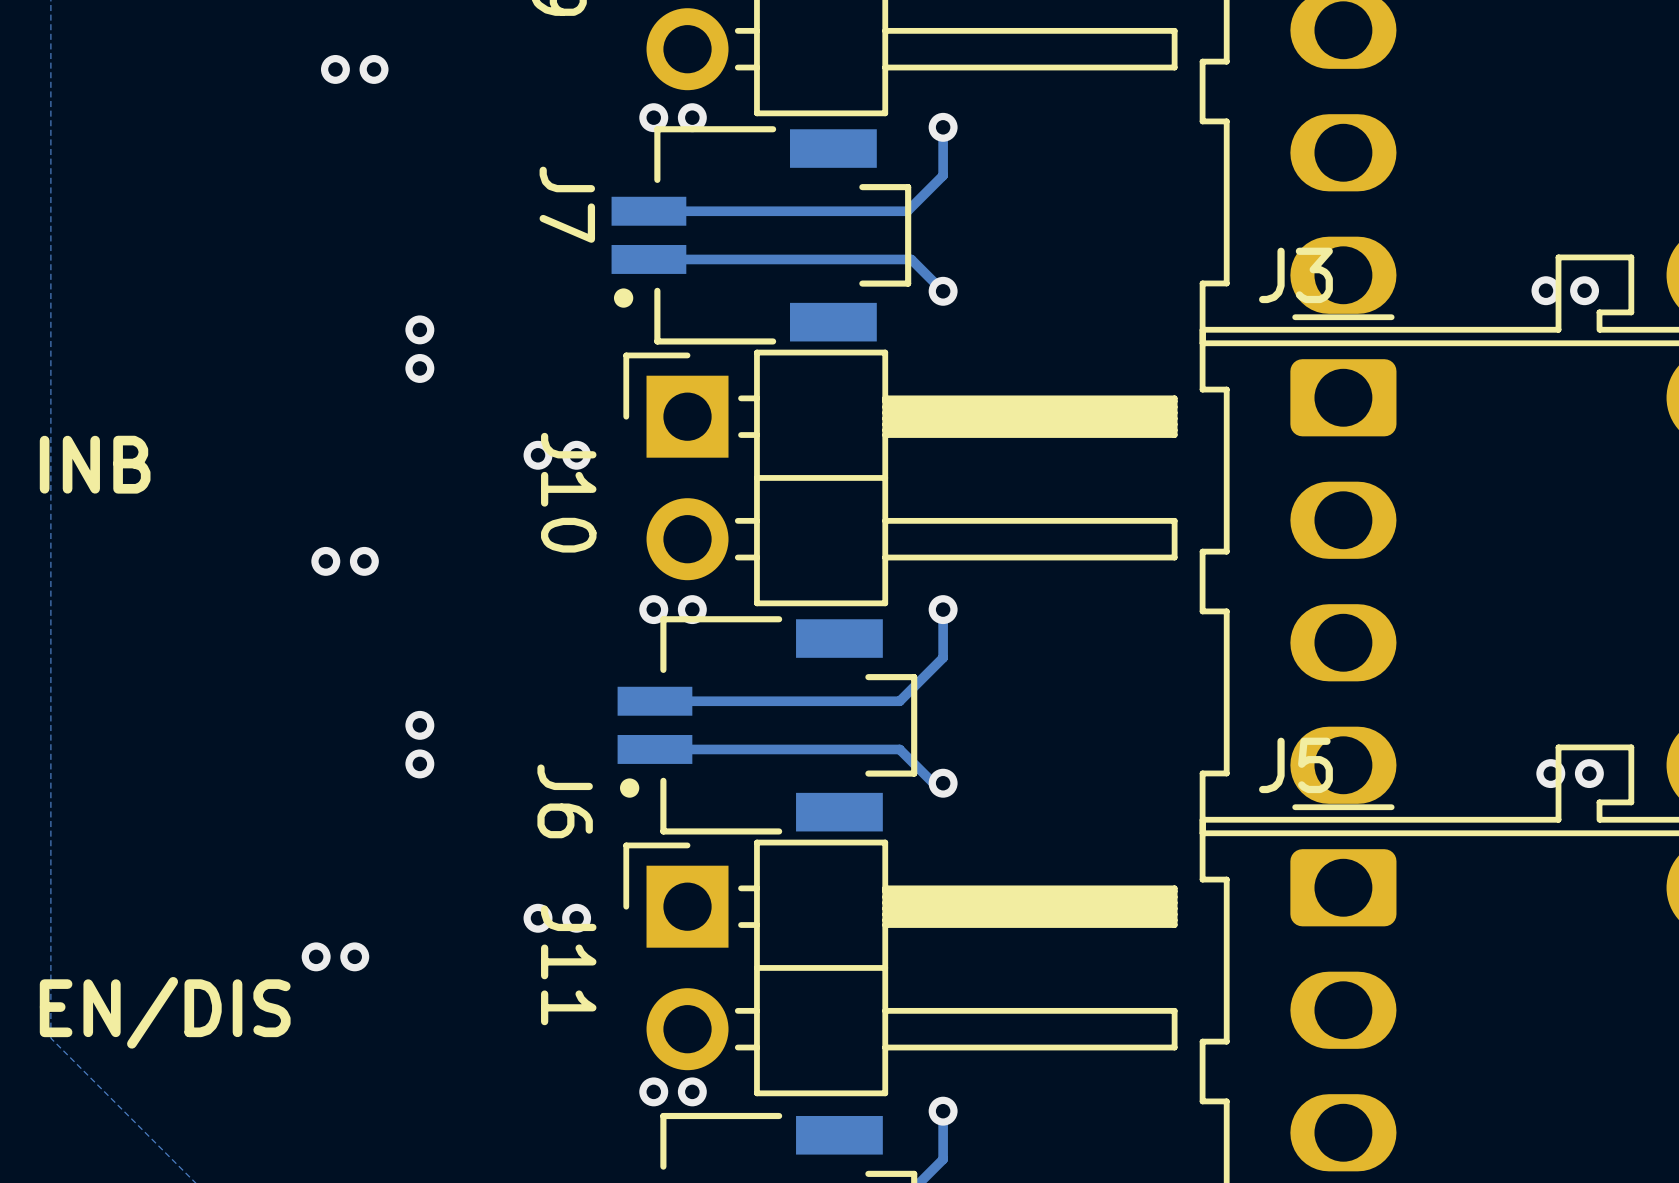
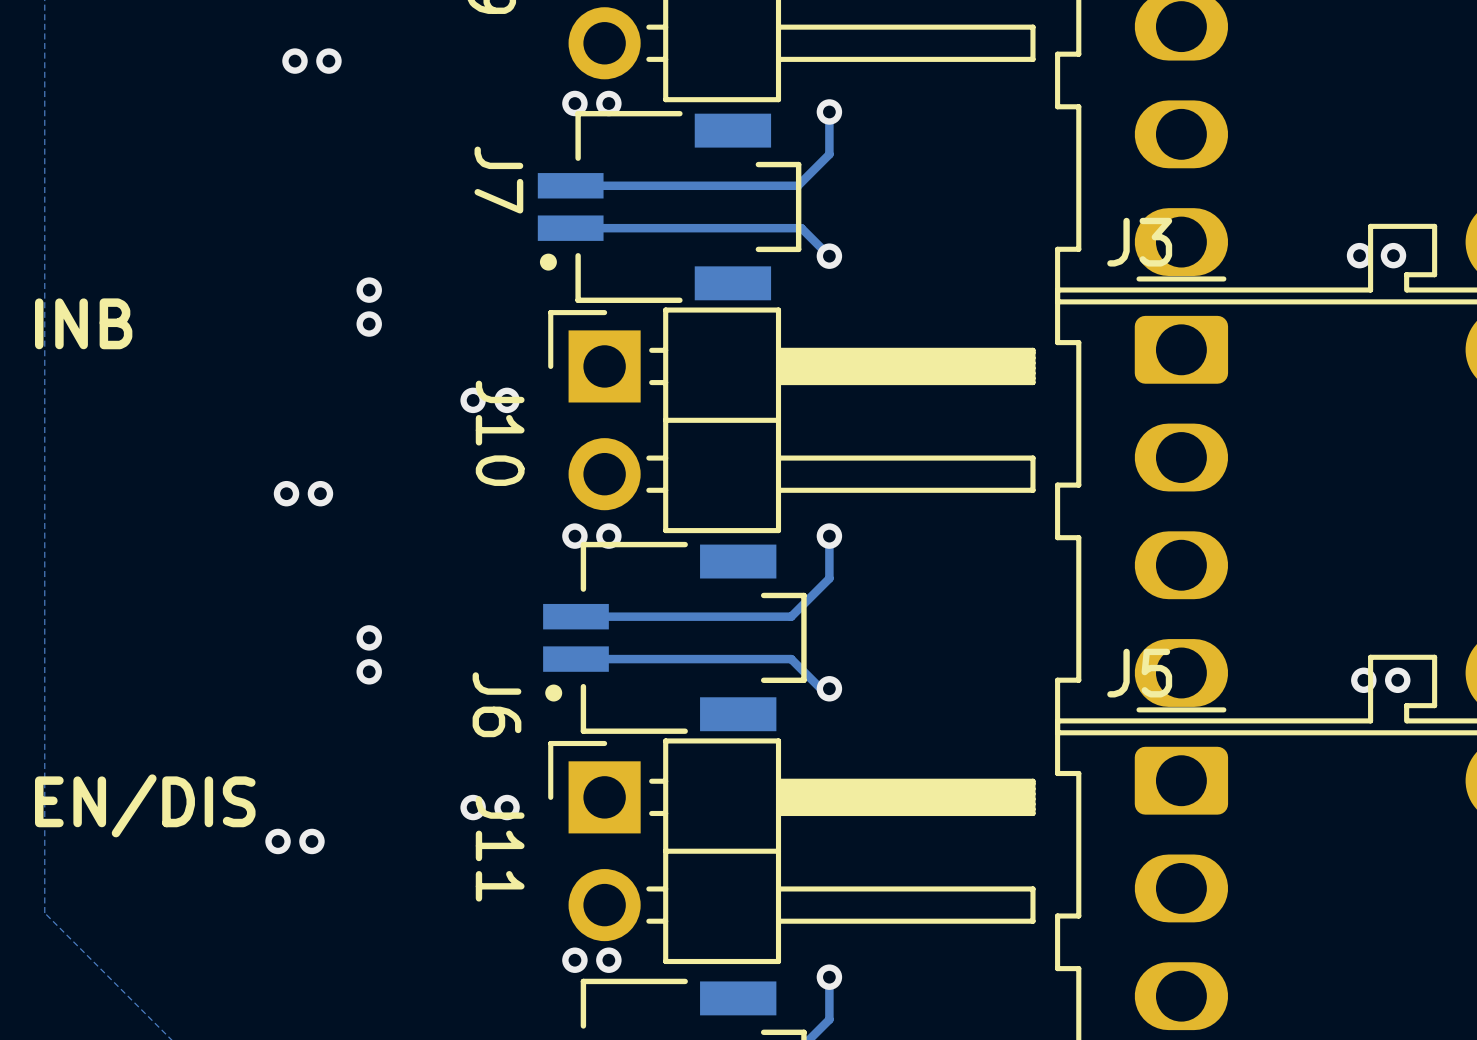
text position: INB (95, 464) -> INB (83, 323)
text position: EN/DIS (165, 1012) -> EN/DIS (145, 805)

